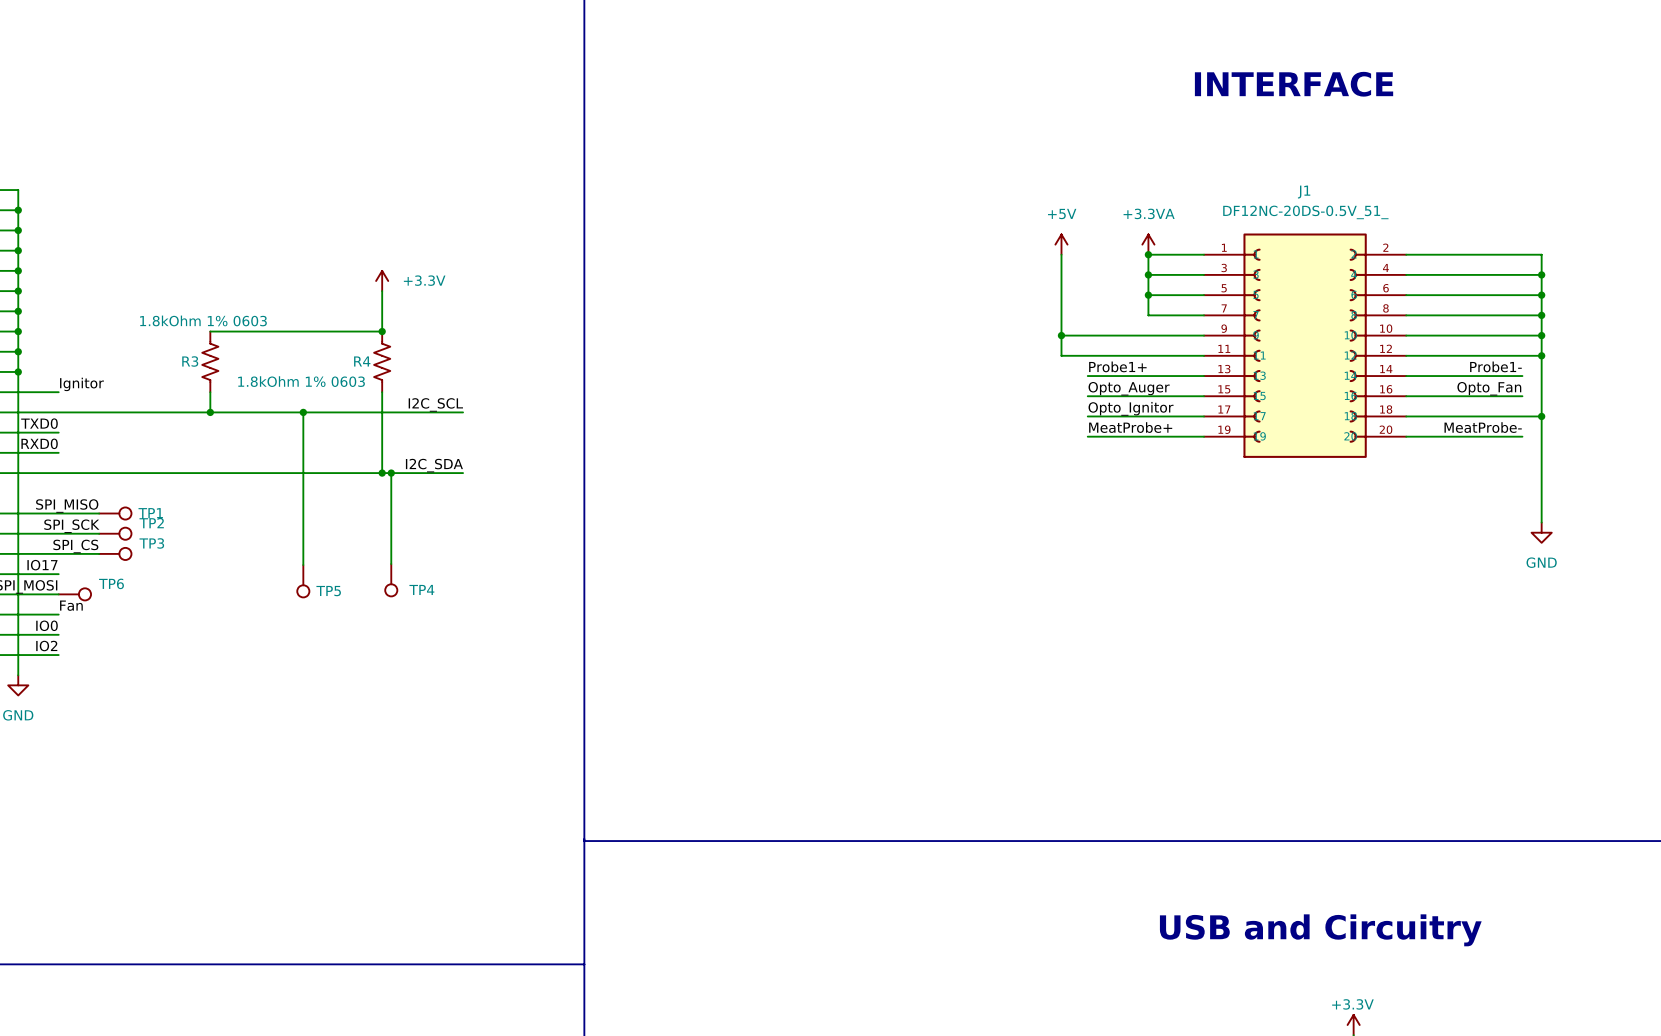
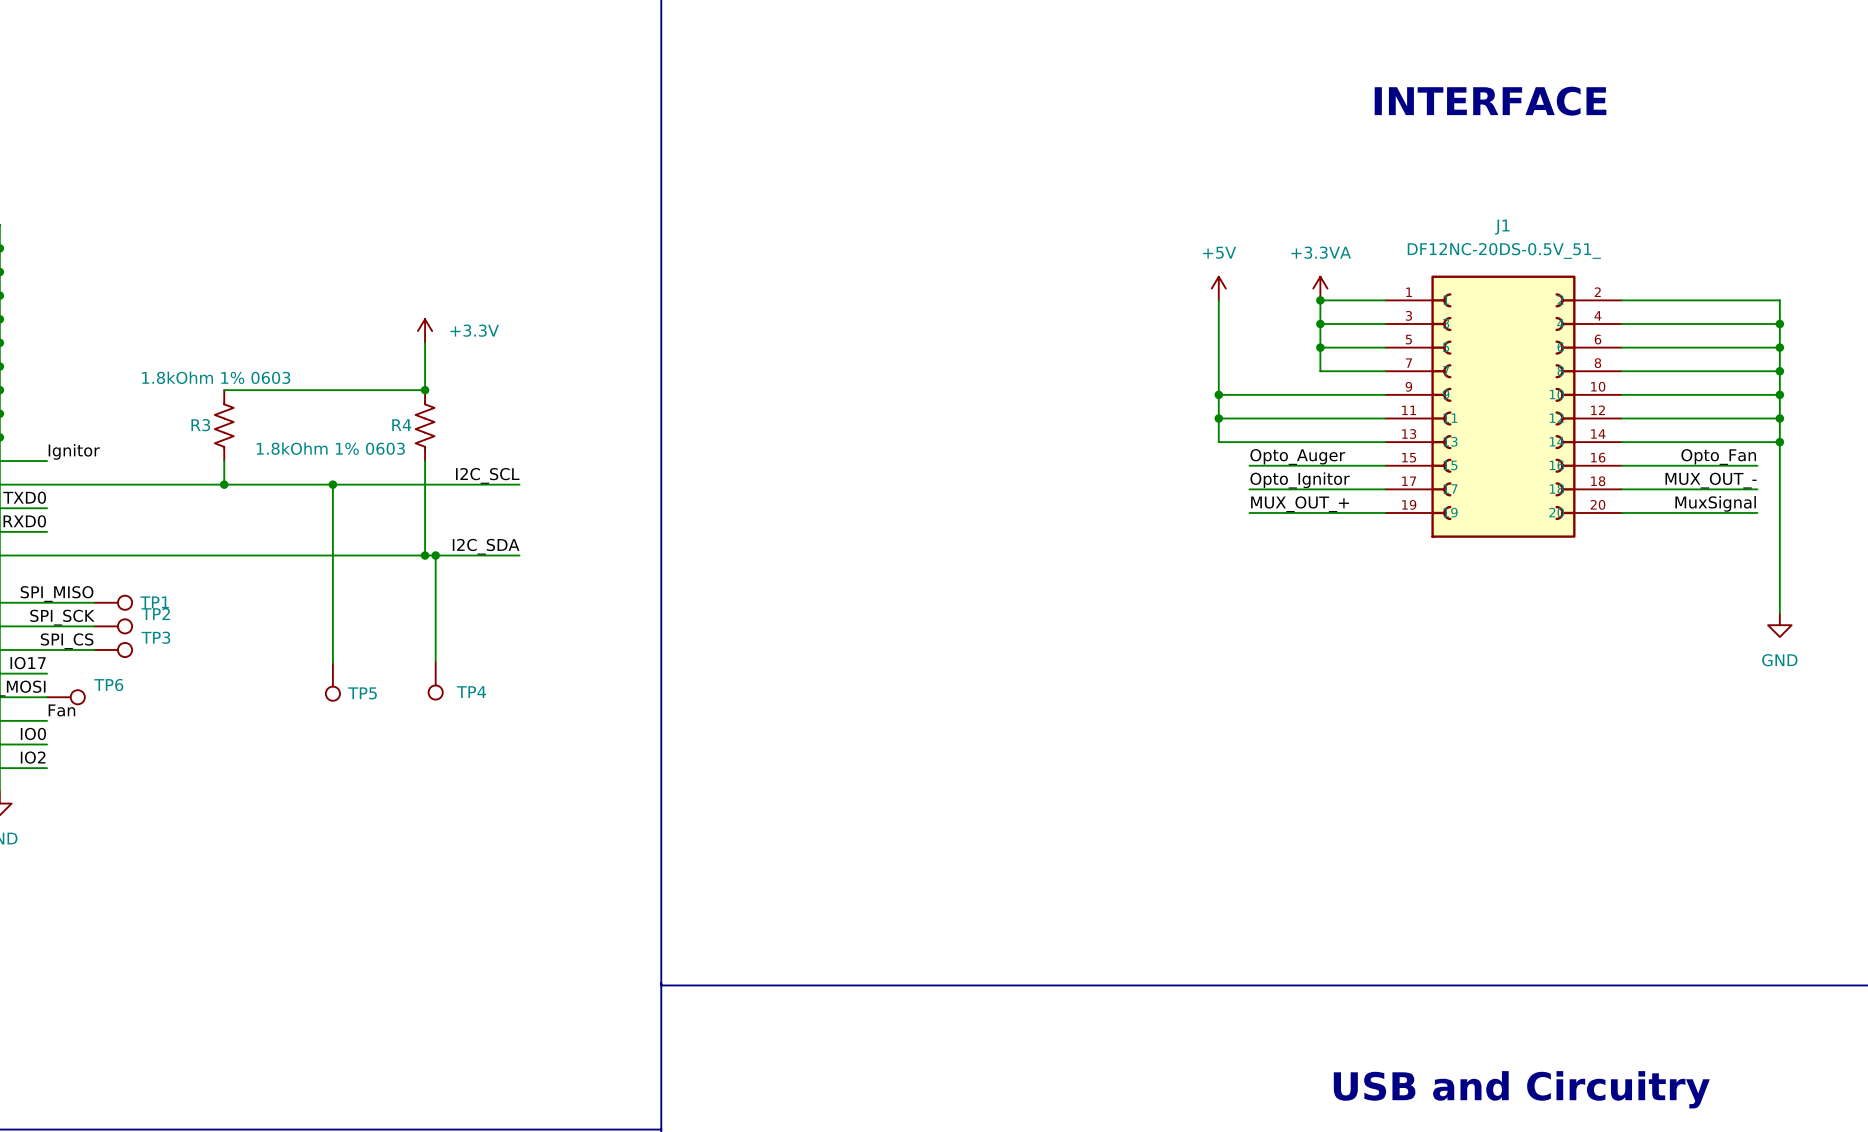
wire: none -> (1218, 418) (1218, 442) (1249, 442)
junction: none -> (1218, 418)
label: Probe1+ (1117, 366) -> none
label: Probe1- (1495, 366) -> none
label: none -> MUX_OUT_- (1711, 480)
wire: (1522, 416) (1541, 416) -> (1757, 442) (1779, 442)
junction position: (1541, 416) -> (1779, 442)
label: MeatProbe+ (1130, 427) -> MUX_OUT_+ (1300, 504)
label: MeatProbe- (1483, 427) -> MuxSignal (1715, 503)

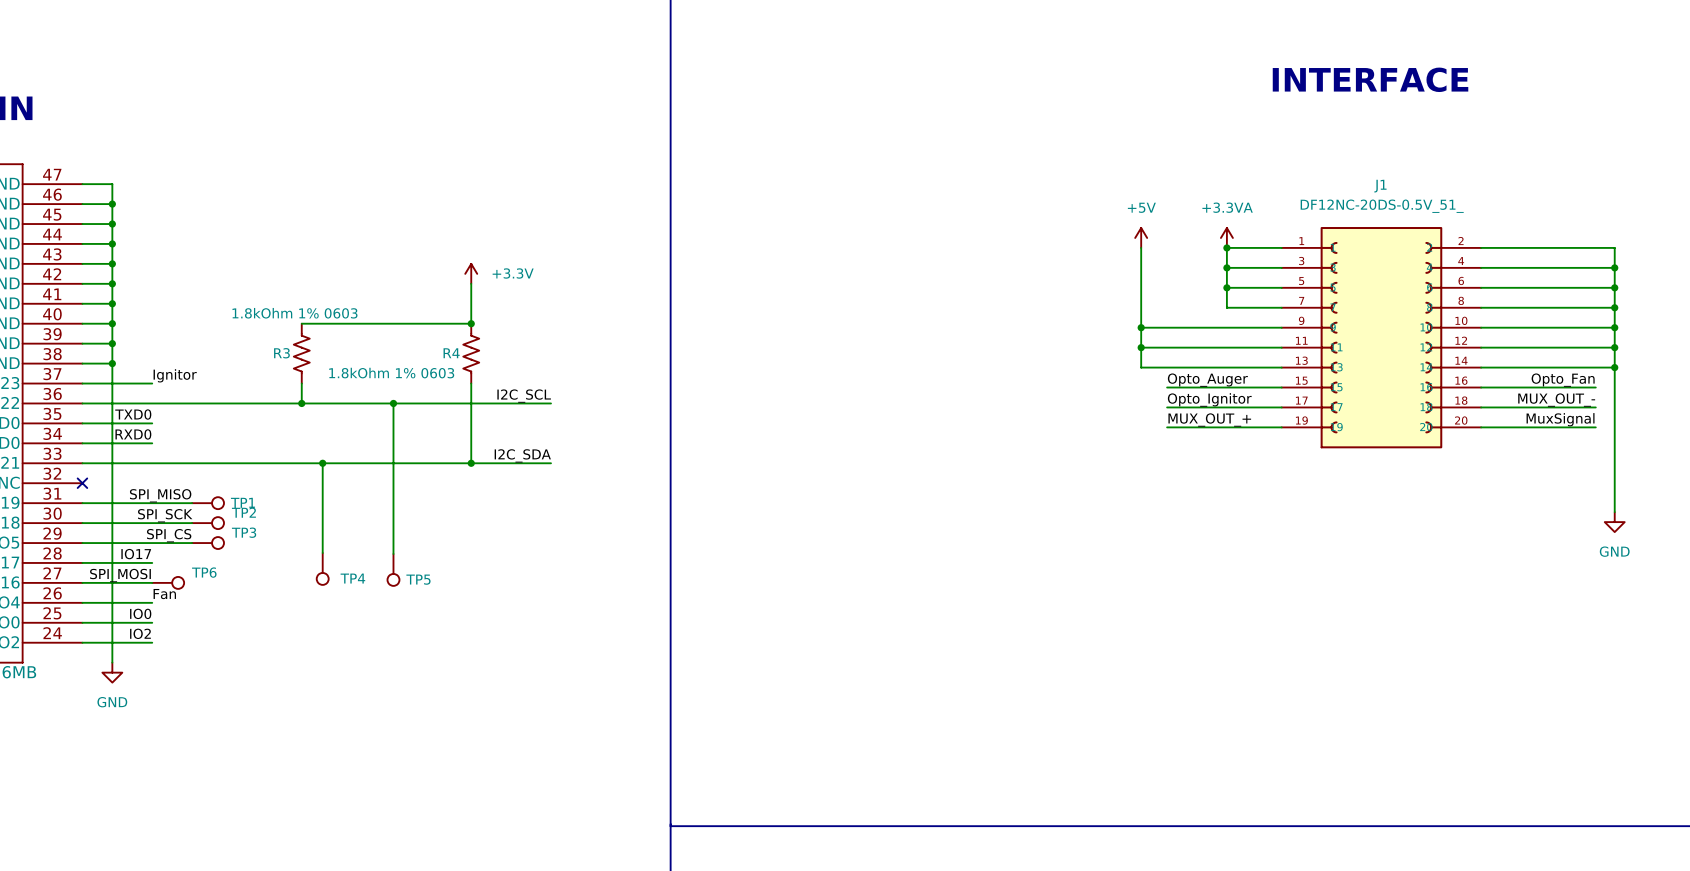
junction: none -> (322, 463)
wire: (435, 555) (435, 661) -> (322, 463) (322, 553)
junction: (435, 555) -> none
TP4 position: (435, 680) -> (322, 568)

